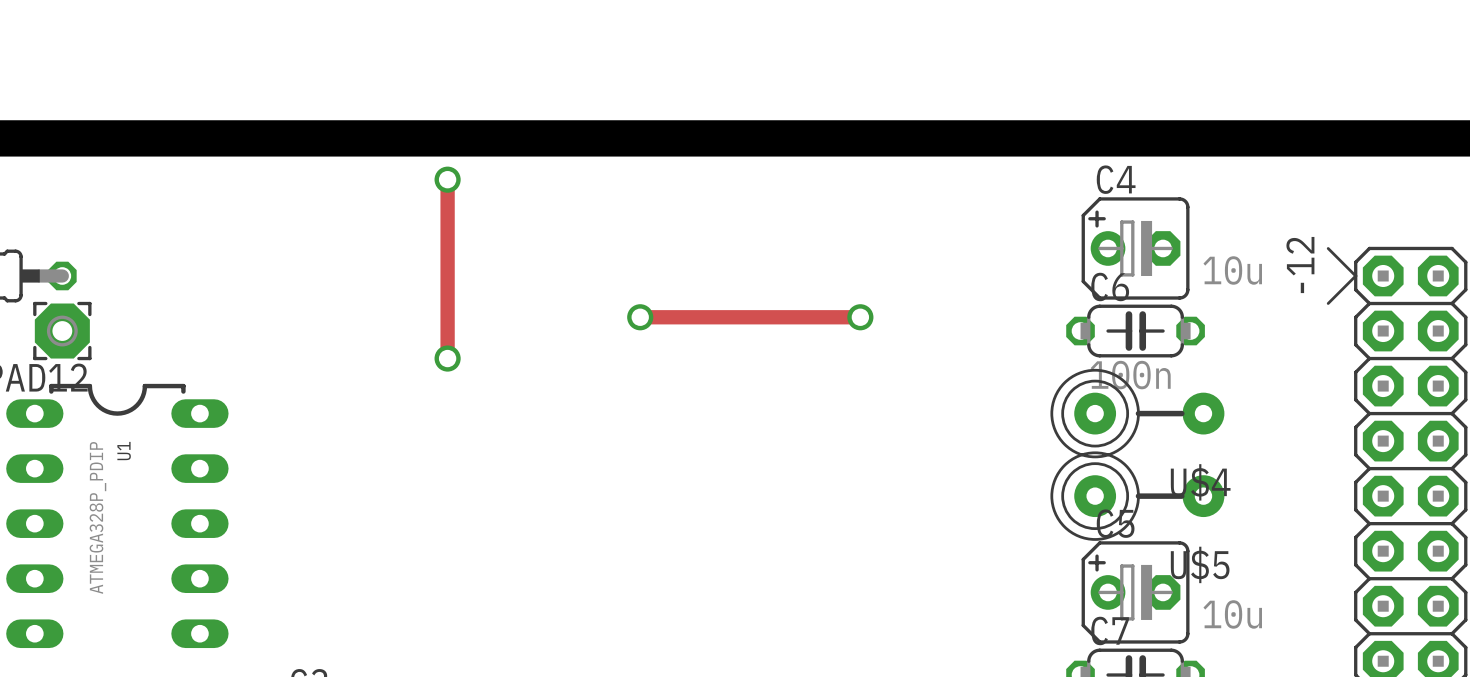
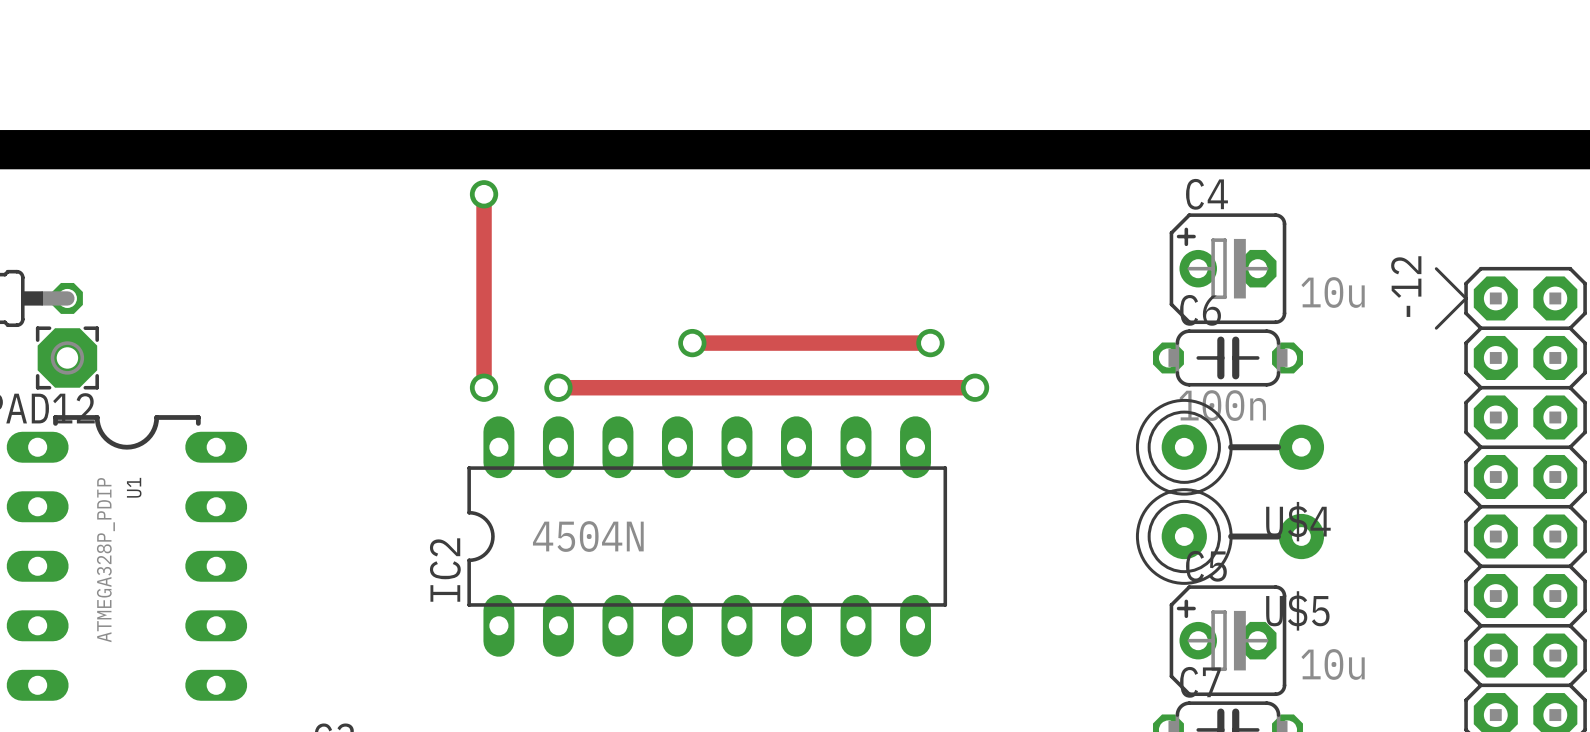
track: none -> (558, 387) (975, 387)
via: none -> (558, 387)
via: none -> (975, 387)
IC2: none -> 4504N (707, 536)

